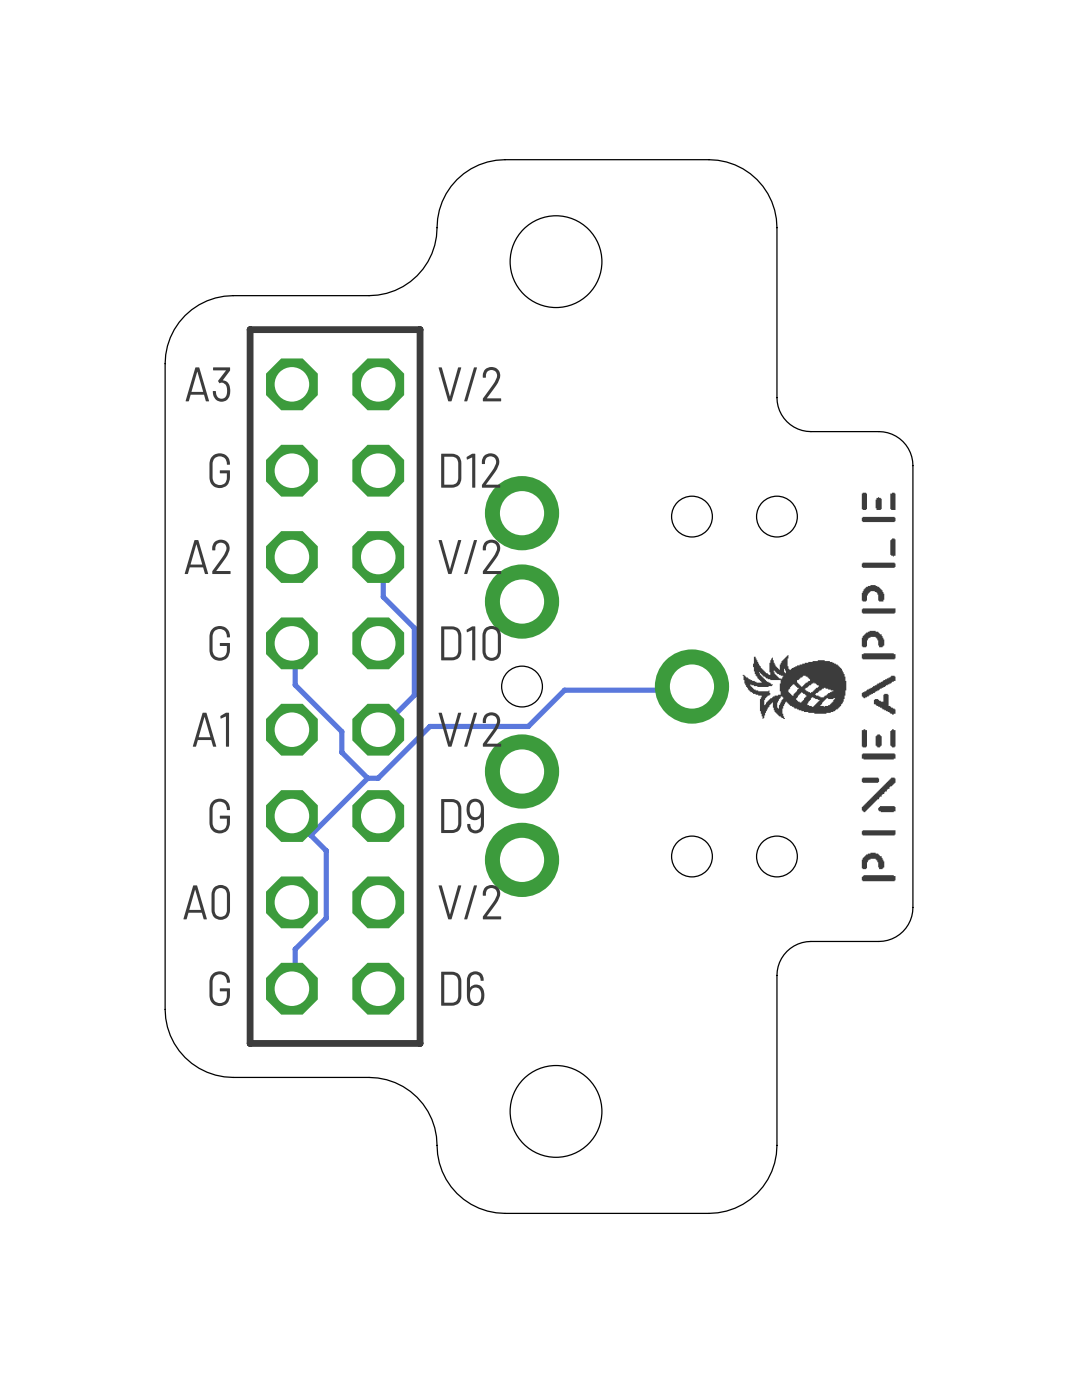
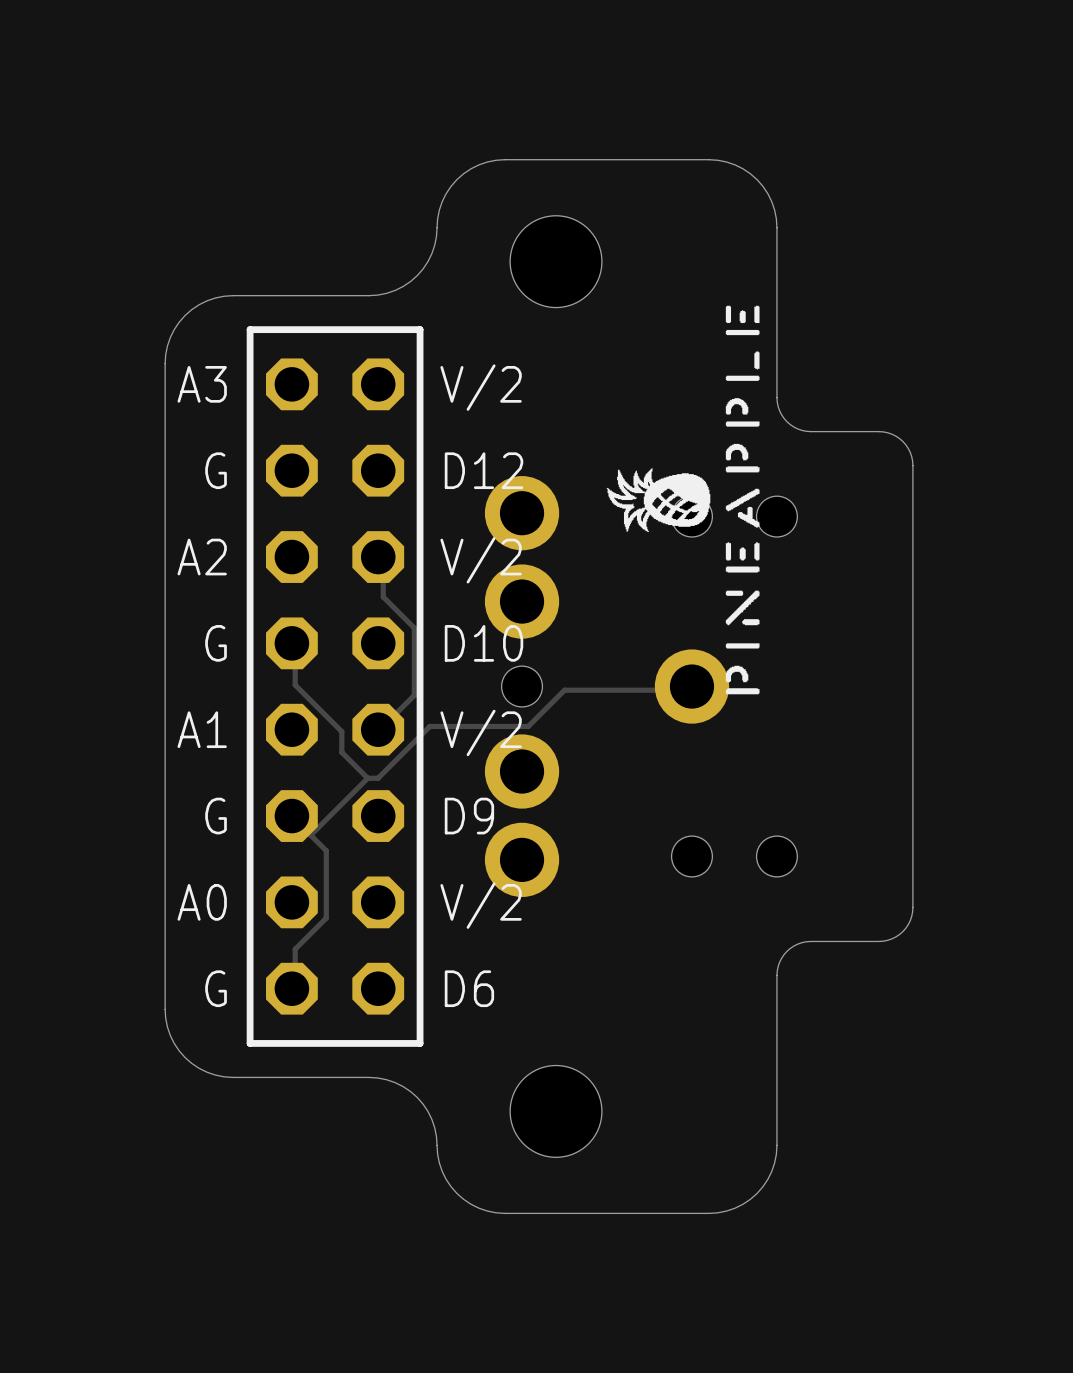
drawing position: (819, 686) -> (683, 500)

